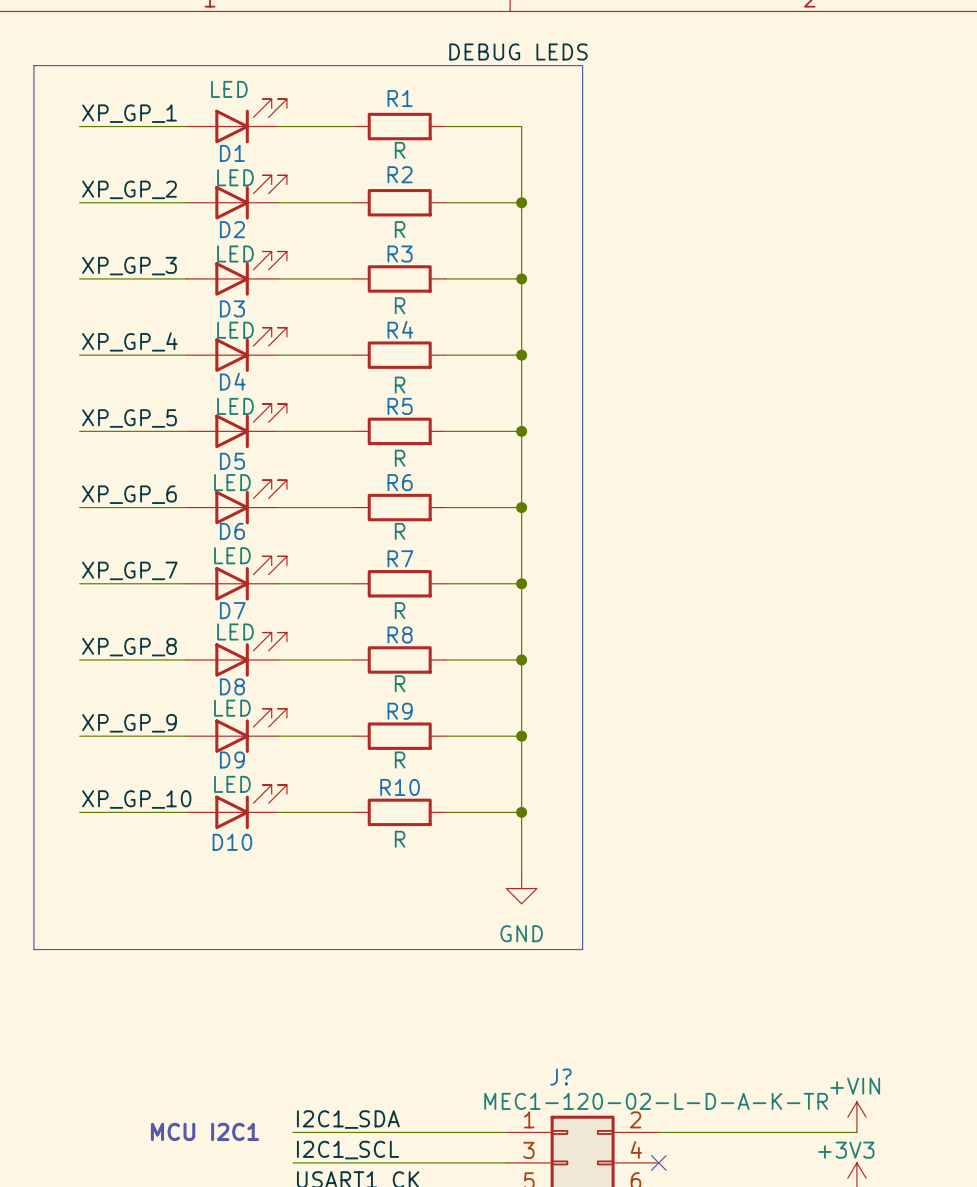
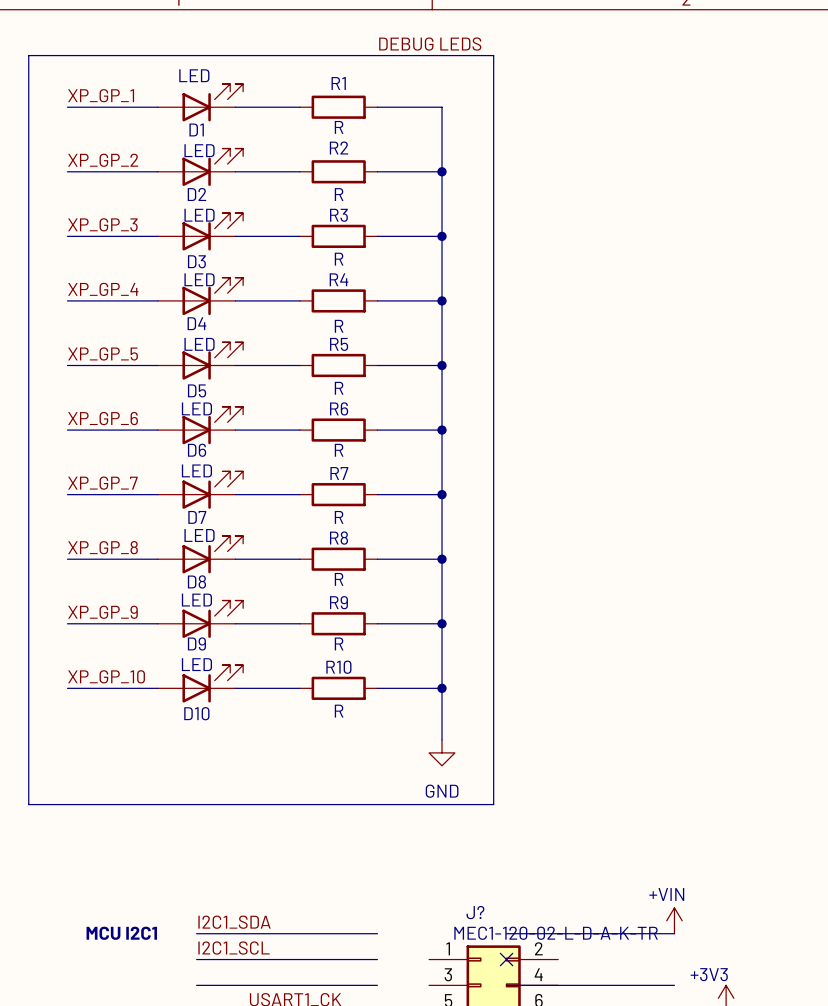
wire: none -> (196, 933) (377, 933)
wire: none -> (506, 933) (674, 933)
power symbol position: +VIN (856, 1117) -> +VIN (674, 920)
label position: I2C1_SDA (348, 1119) -> I2C1_SDA (234, 922)
text position: MCU I2C1 (205, 1131) -> MCU I2C1 (121, 933)
wire: (445, 1132) (506, 1132) -> (196, 959) (248, 959)
wire: (658, 1132) (856, 1132) -> (506, 985) (674, 985)
label position: I2C1_SCL (347, 1150) -> I2C1_SCL (234, 948)
wire: (445, 1162) (506, 1162) -> (196, 985) (248, 985)
no-connect mark position: (658, 1162) -> (506, 959)

